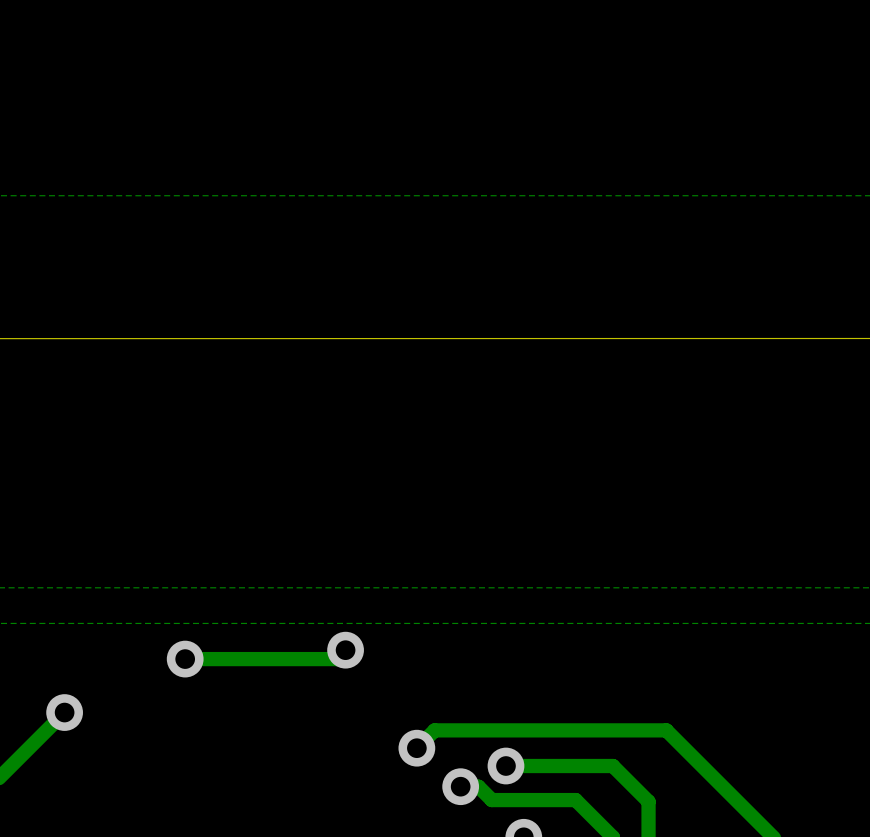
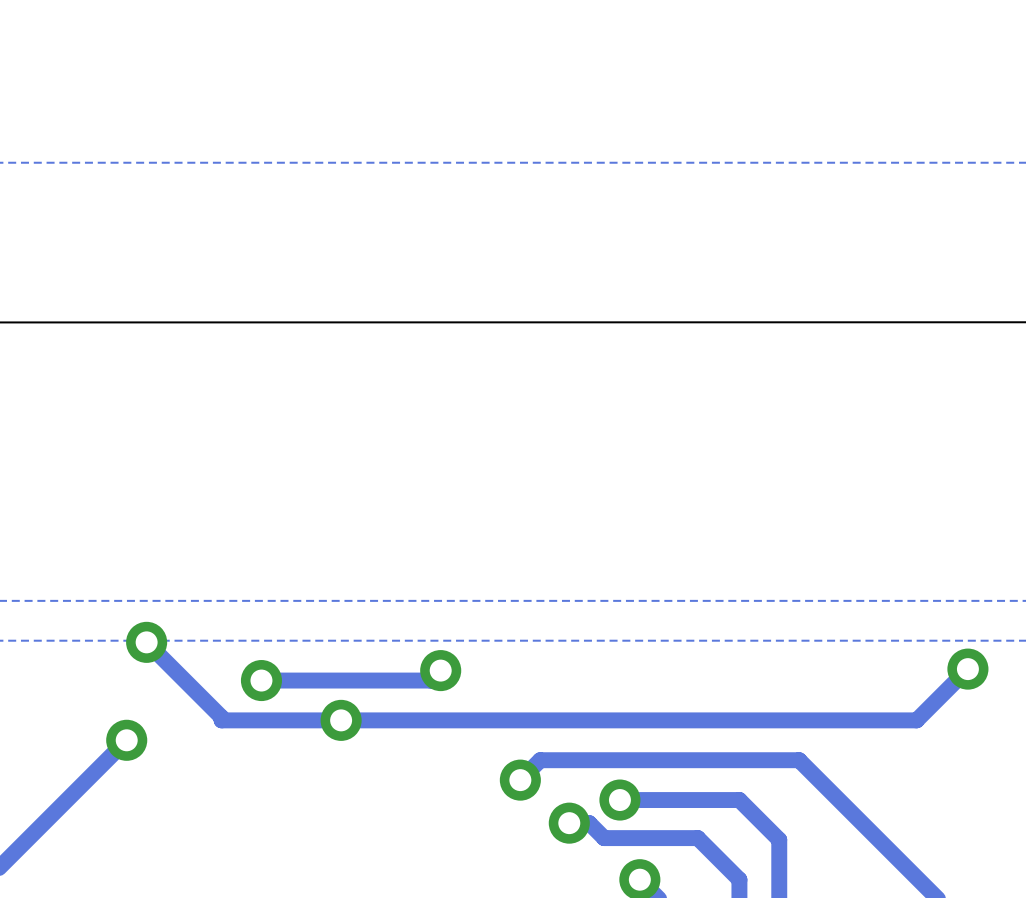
track: none -> (146, 642) (221, 717) (221, 720) (916, 720) (967, 669)
via: none -> (146, 642)
via: none -> (967, 669)
via: none -> (341, 720)

